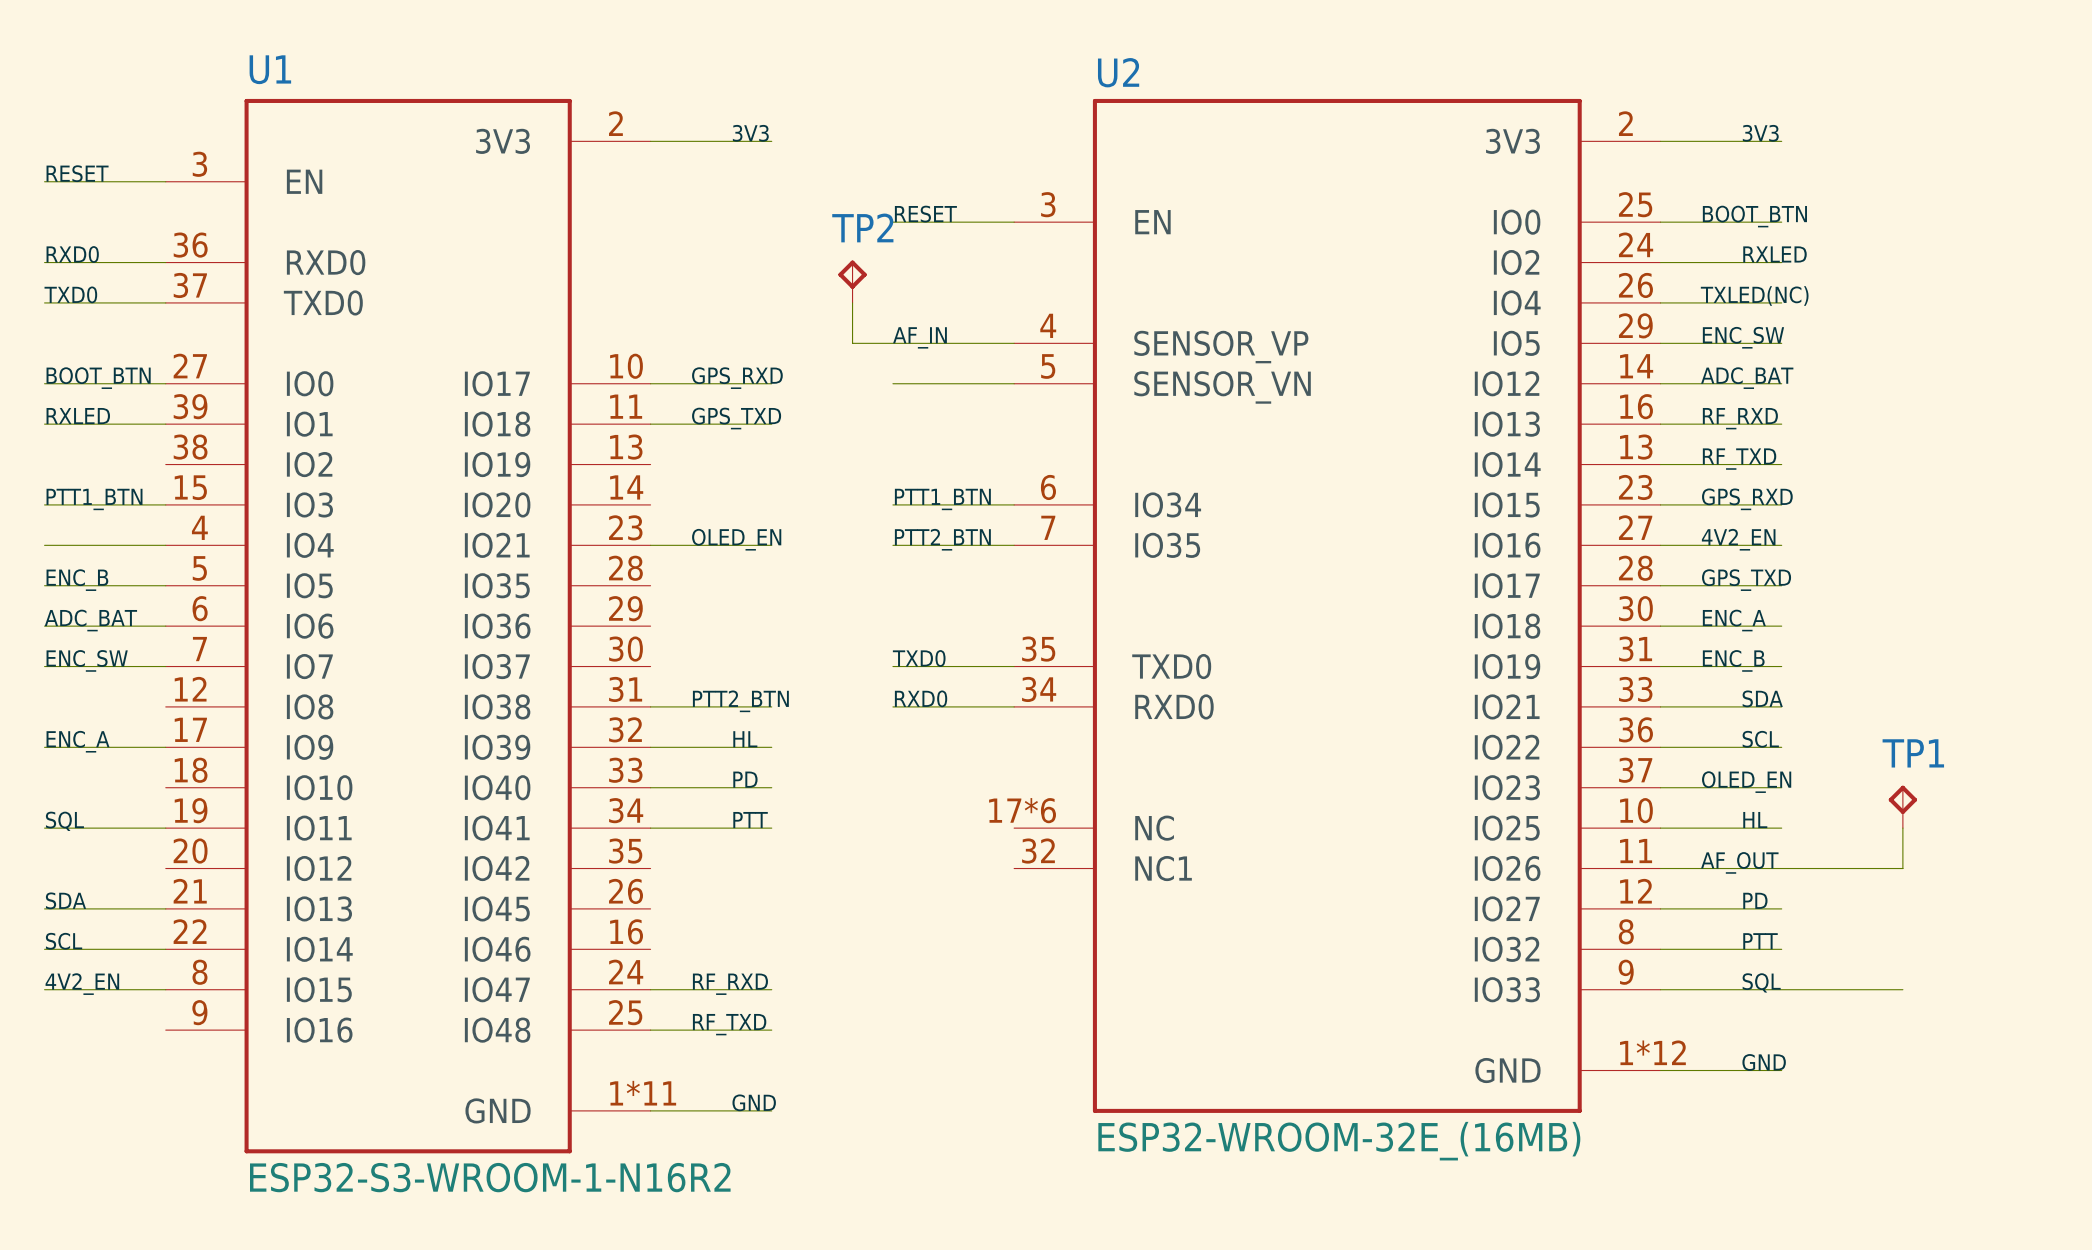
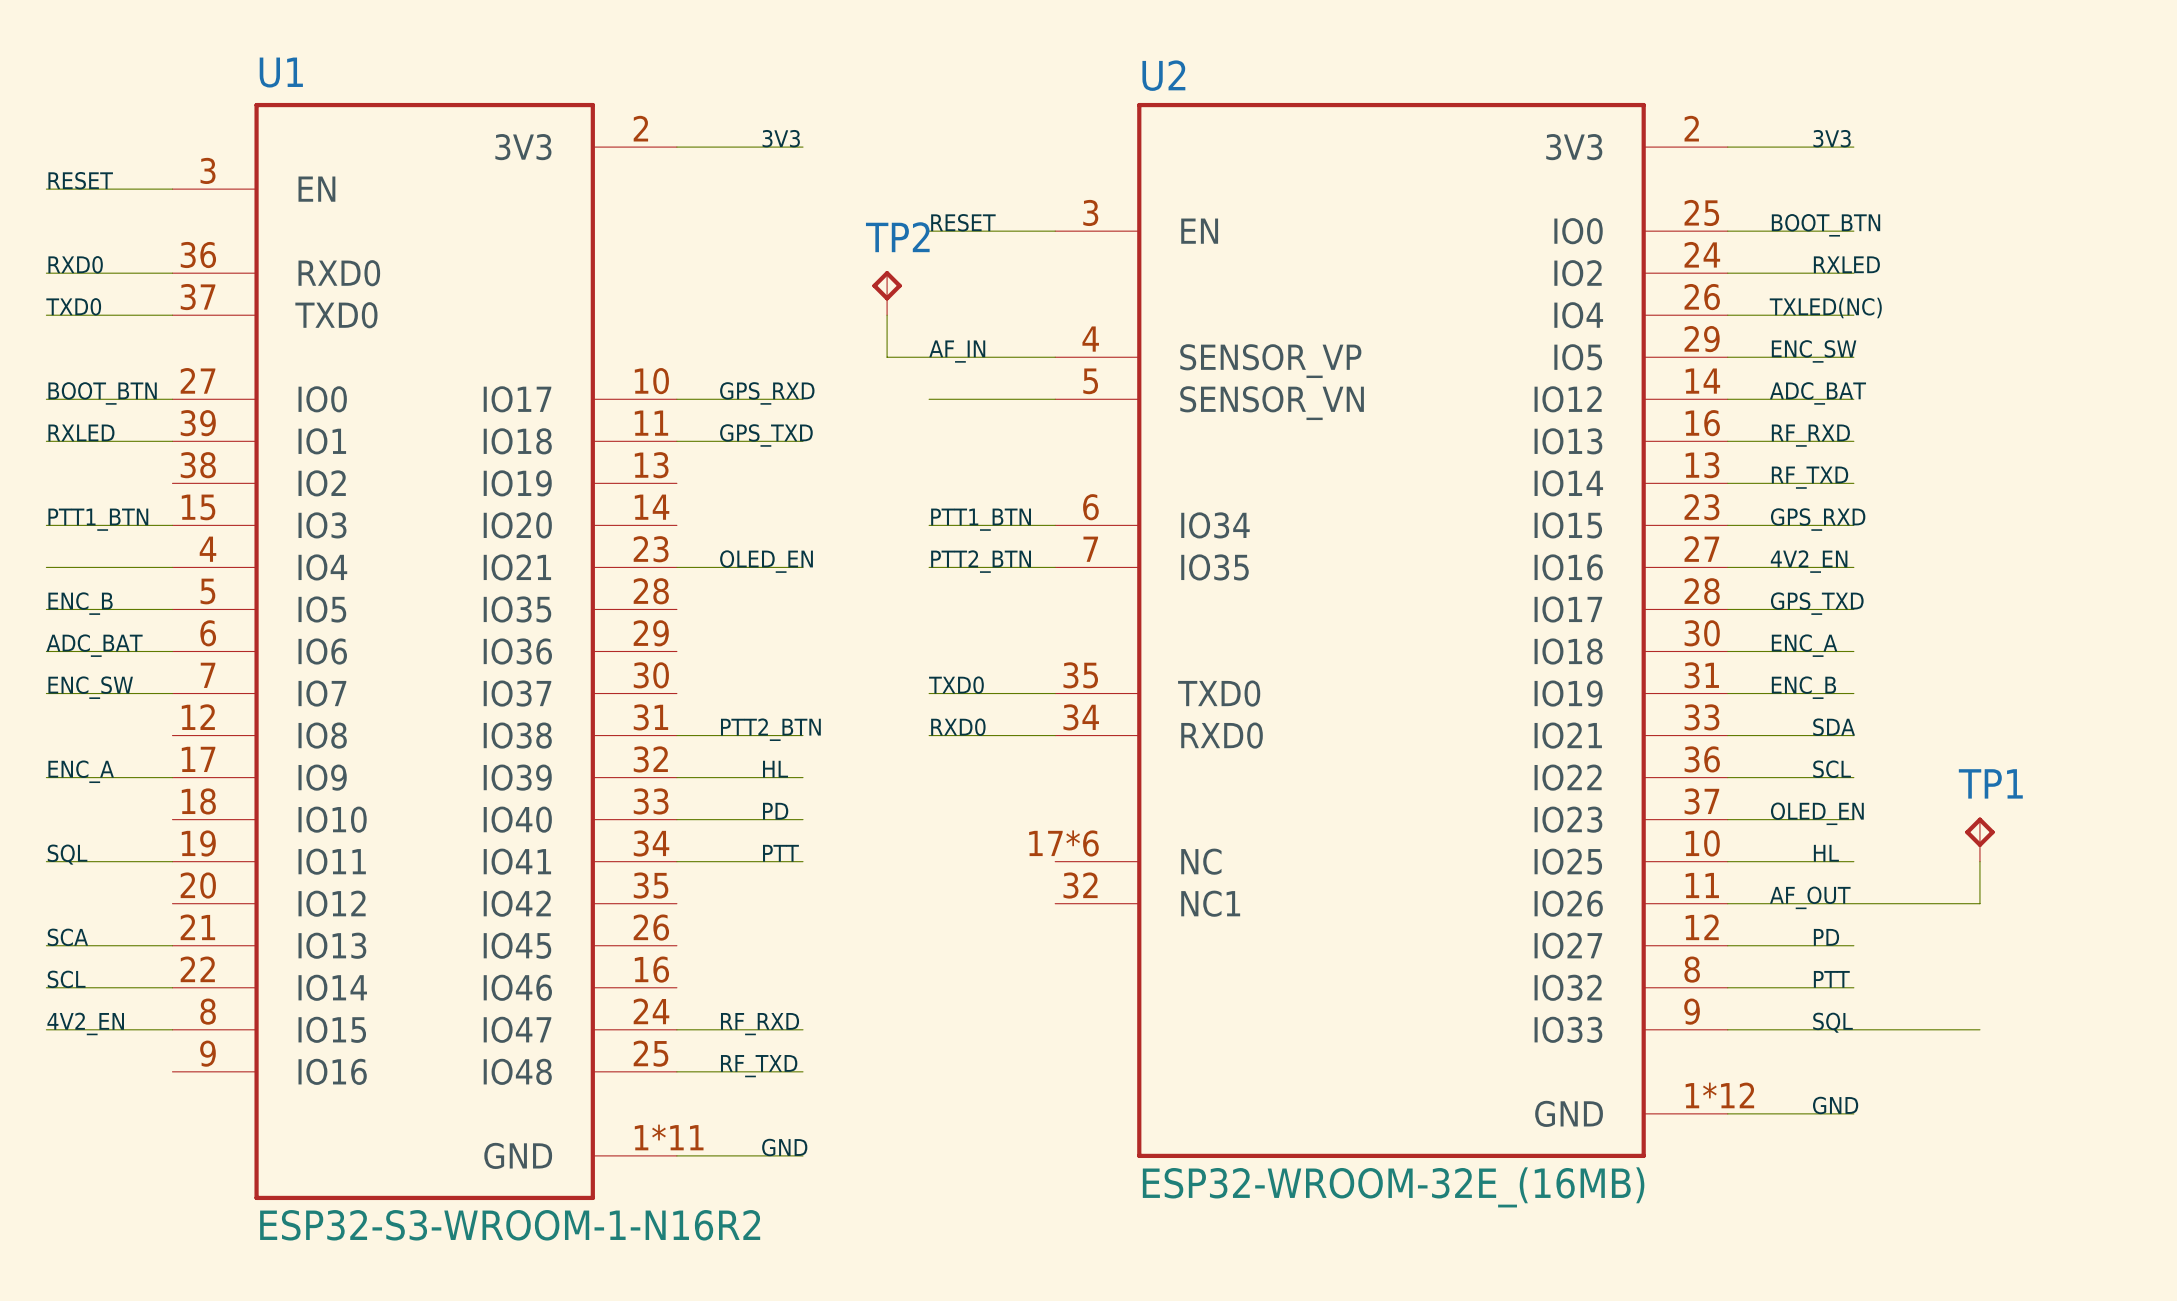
label: SDA (65, 900) -> SCA (67, 937)

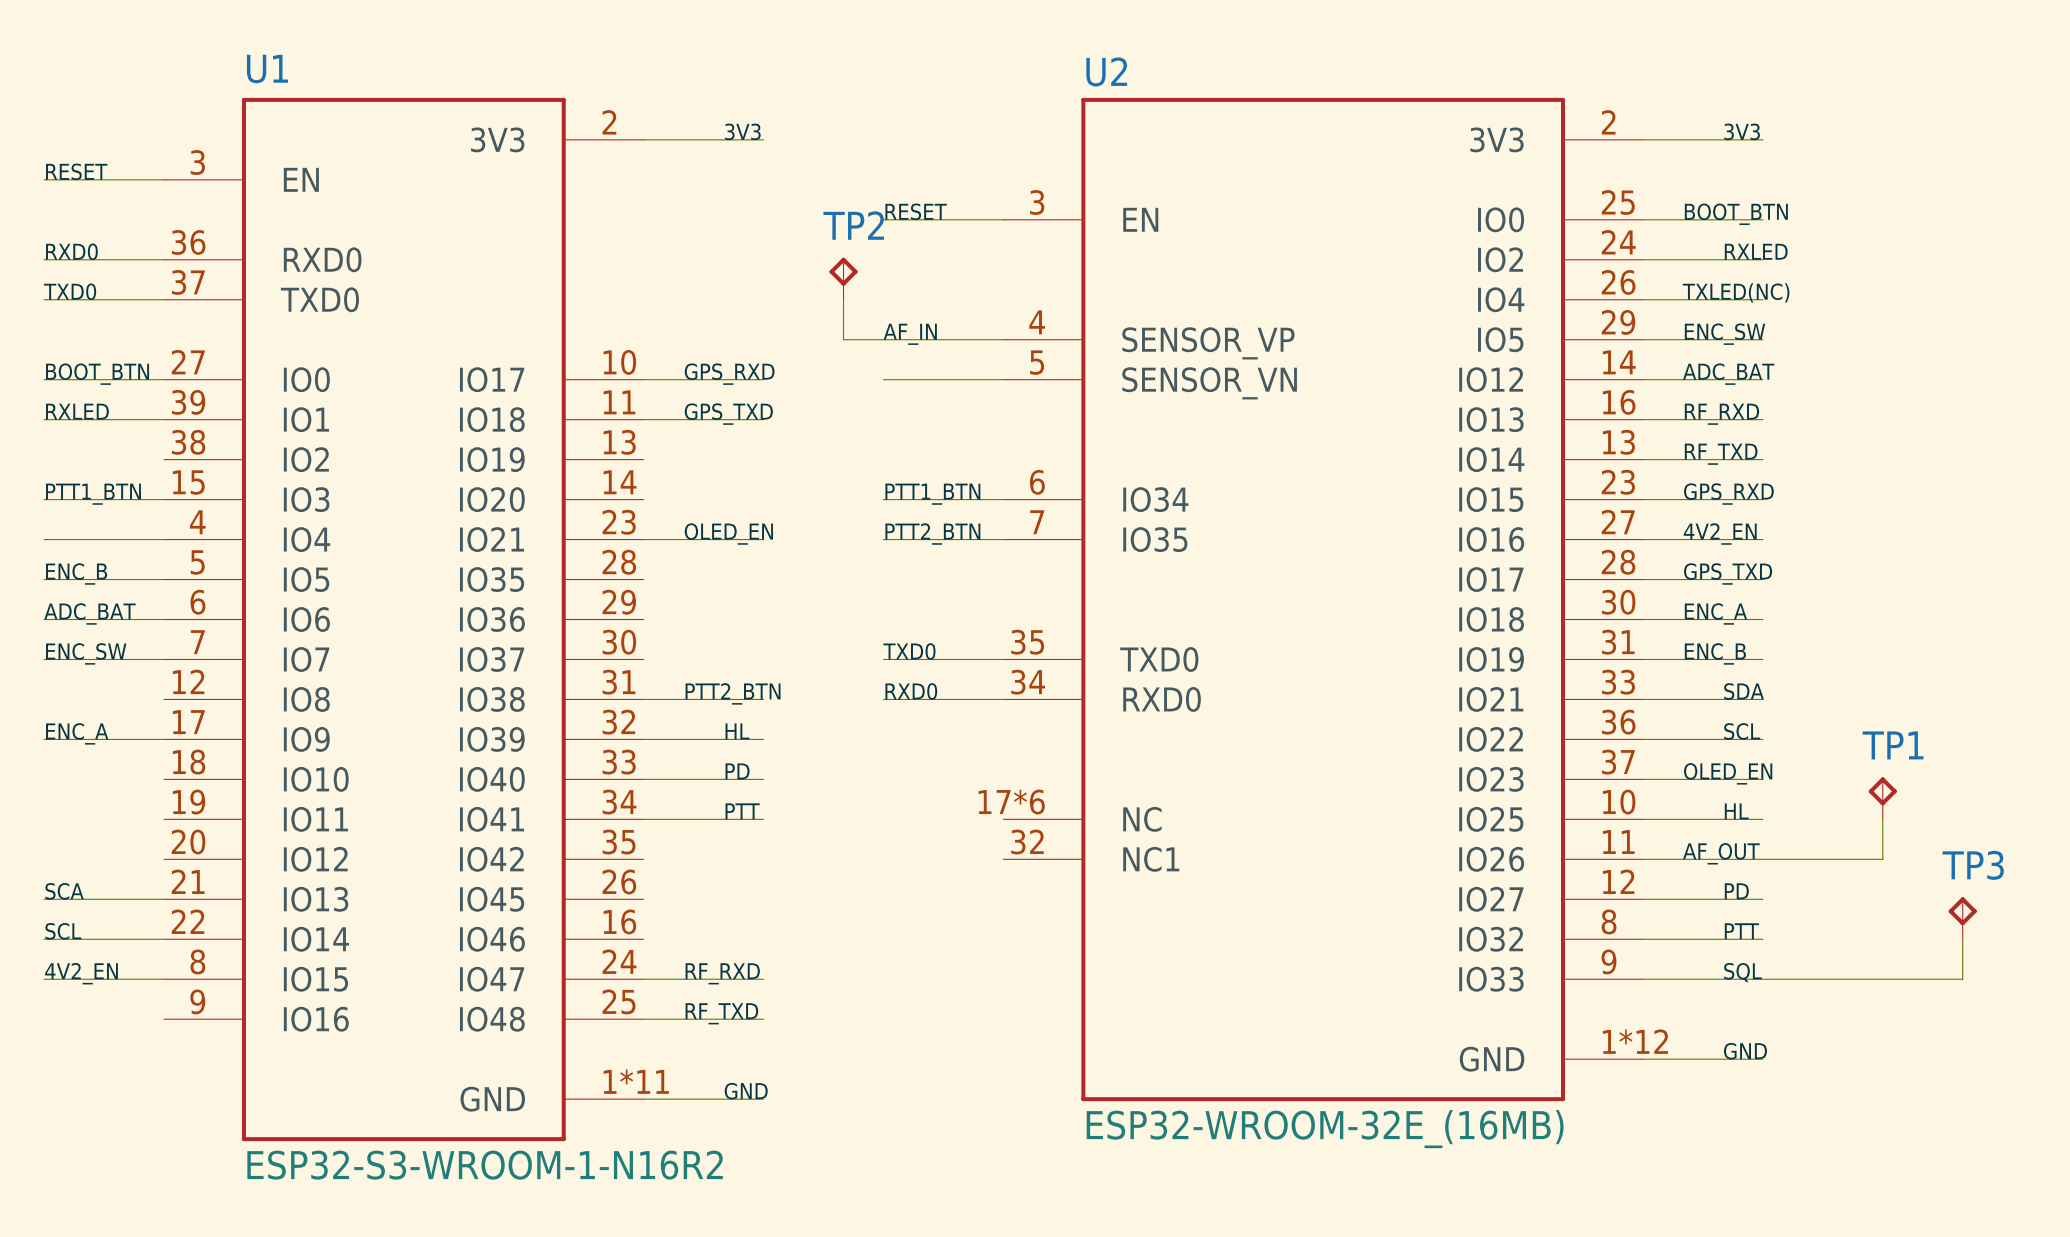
label: SQL (67, 854) -> none
wire: (46, 861) (172, 861) -> none
TP3: none -> (1962, 918)
wire: none -> (1962, 939) (1962, 979) (1882, 979)

